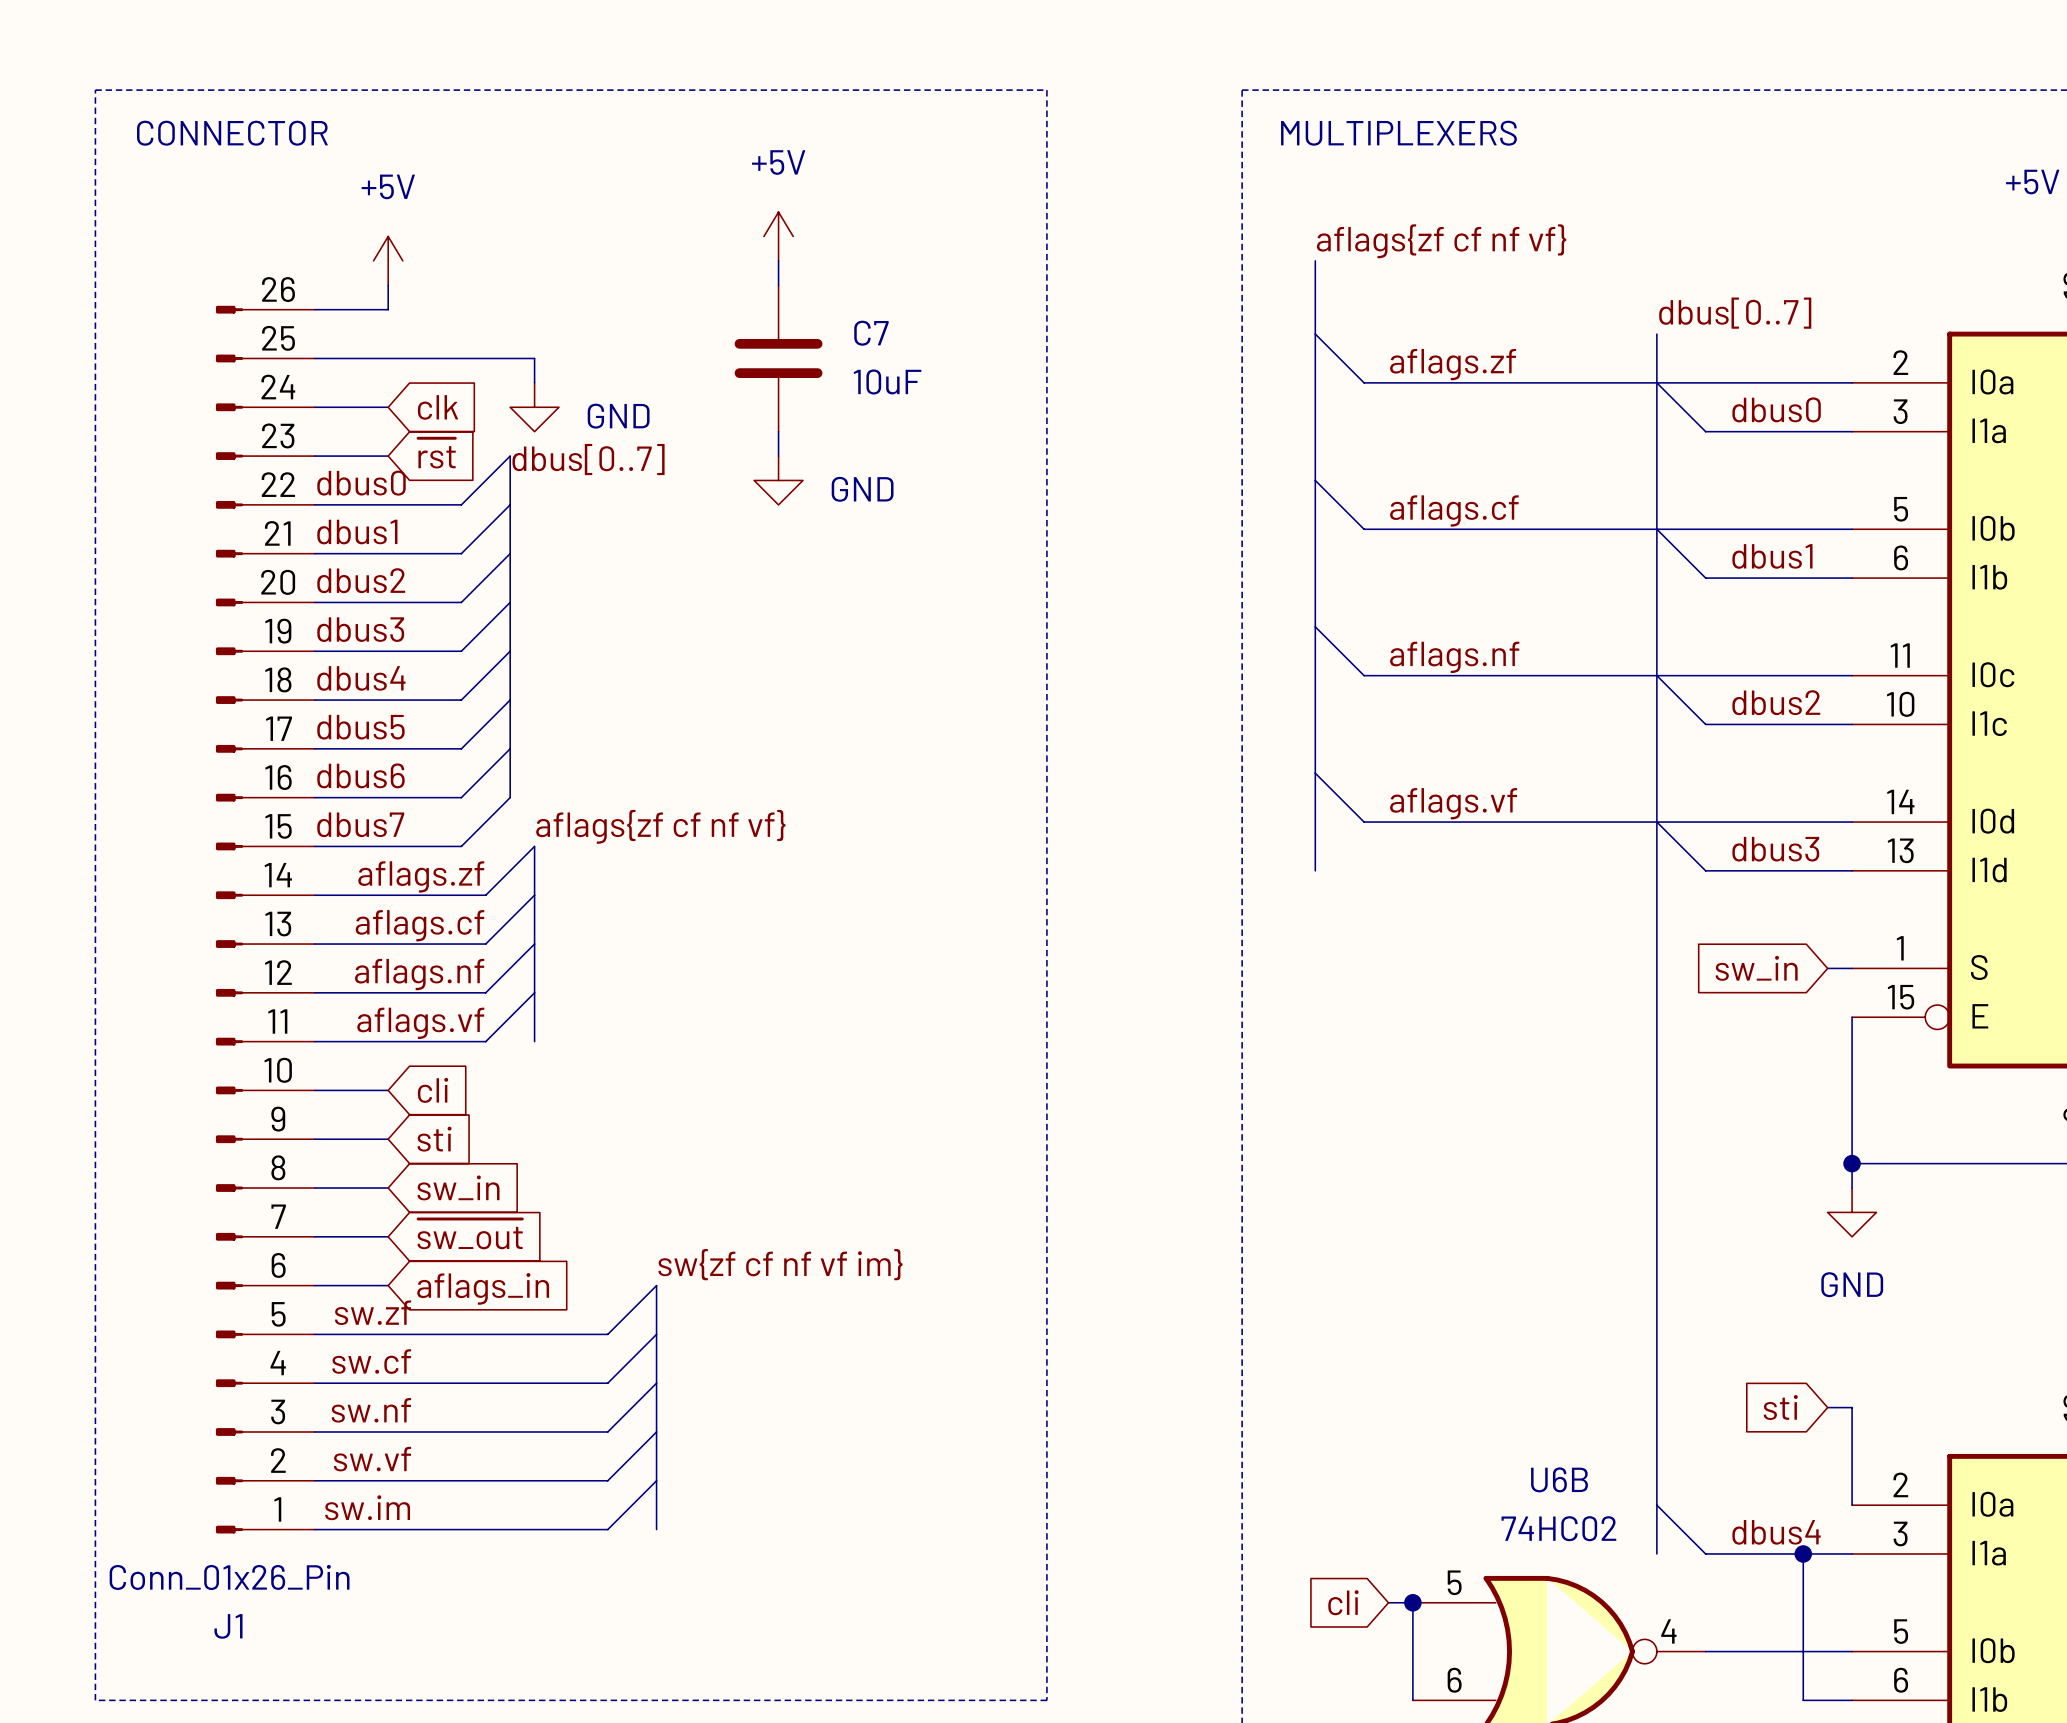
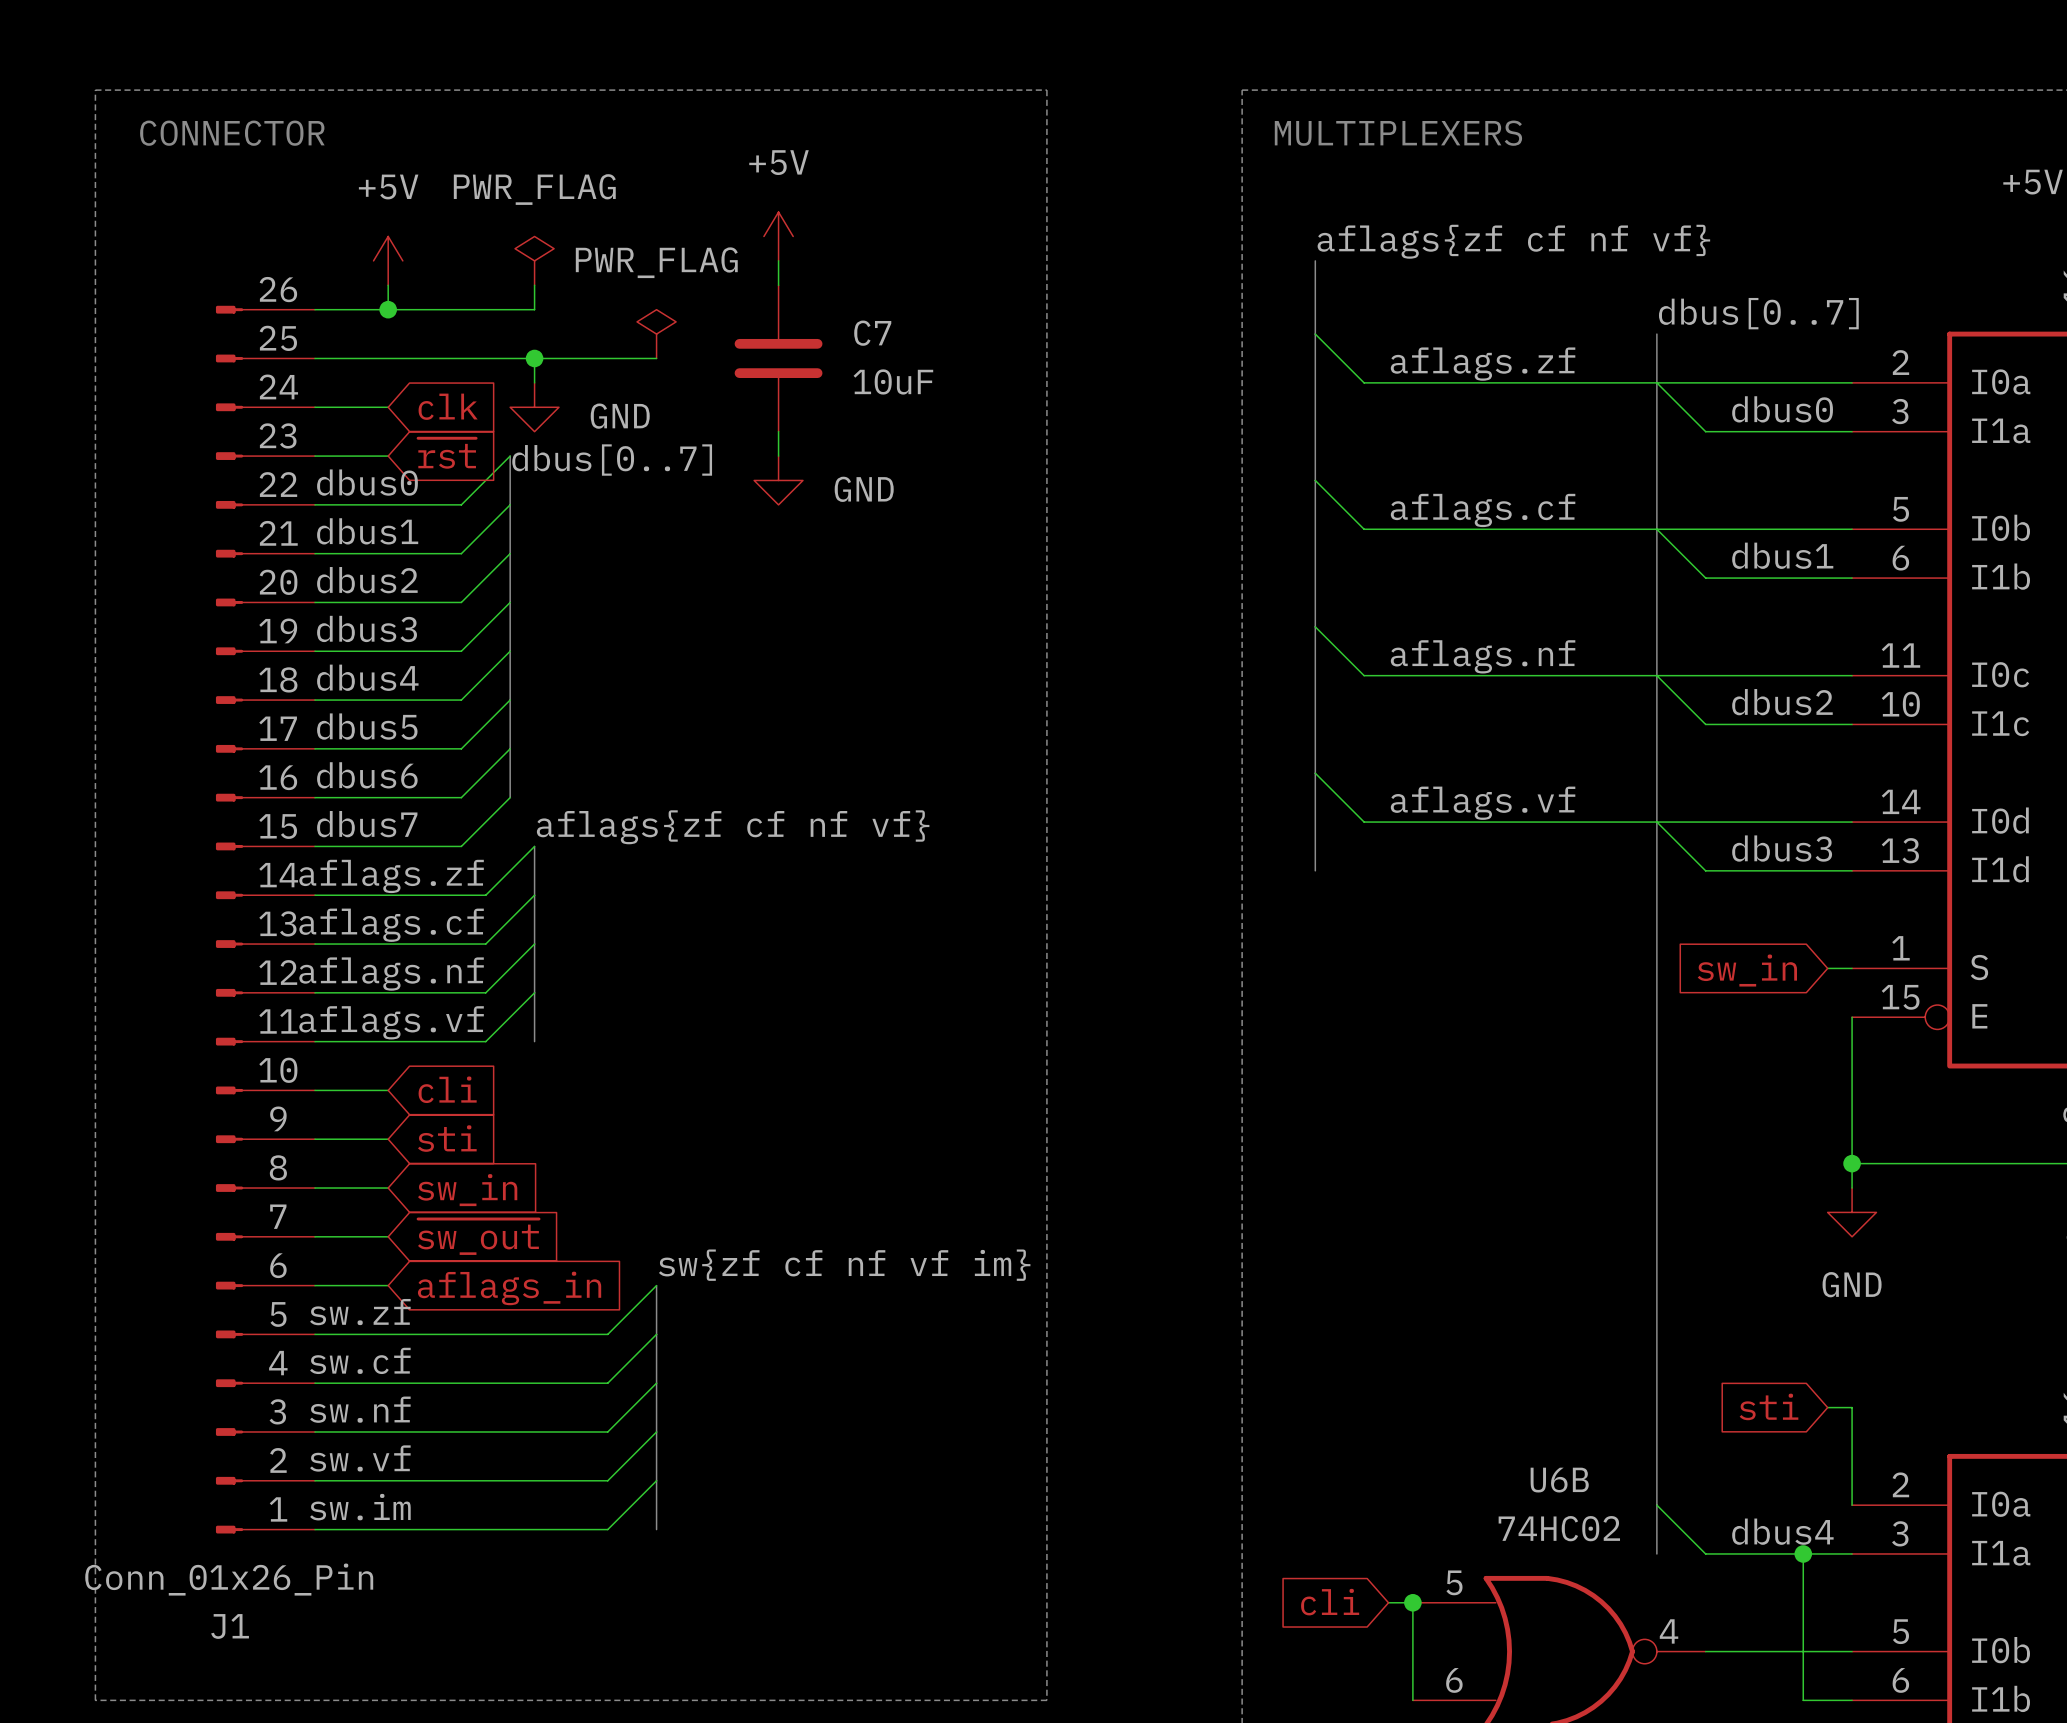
power symbol: none -> PWR_FLAG (534, 260)
wire: none -> (534, 285) (534, 309) (388, 309)
junction: none -> (388, 309)
power symbol: none -> PWR_FLAG (656, 334)
wire: none -> (534, 358) (656, 358)
junction: none -> (534, 358)

